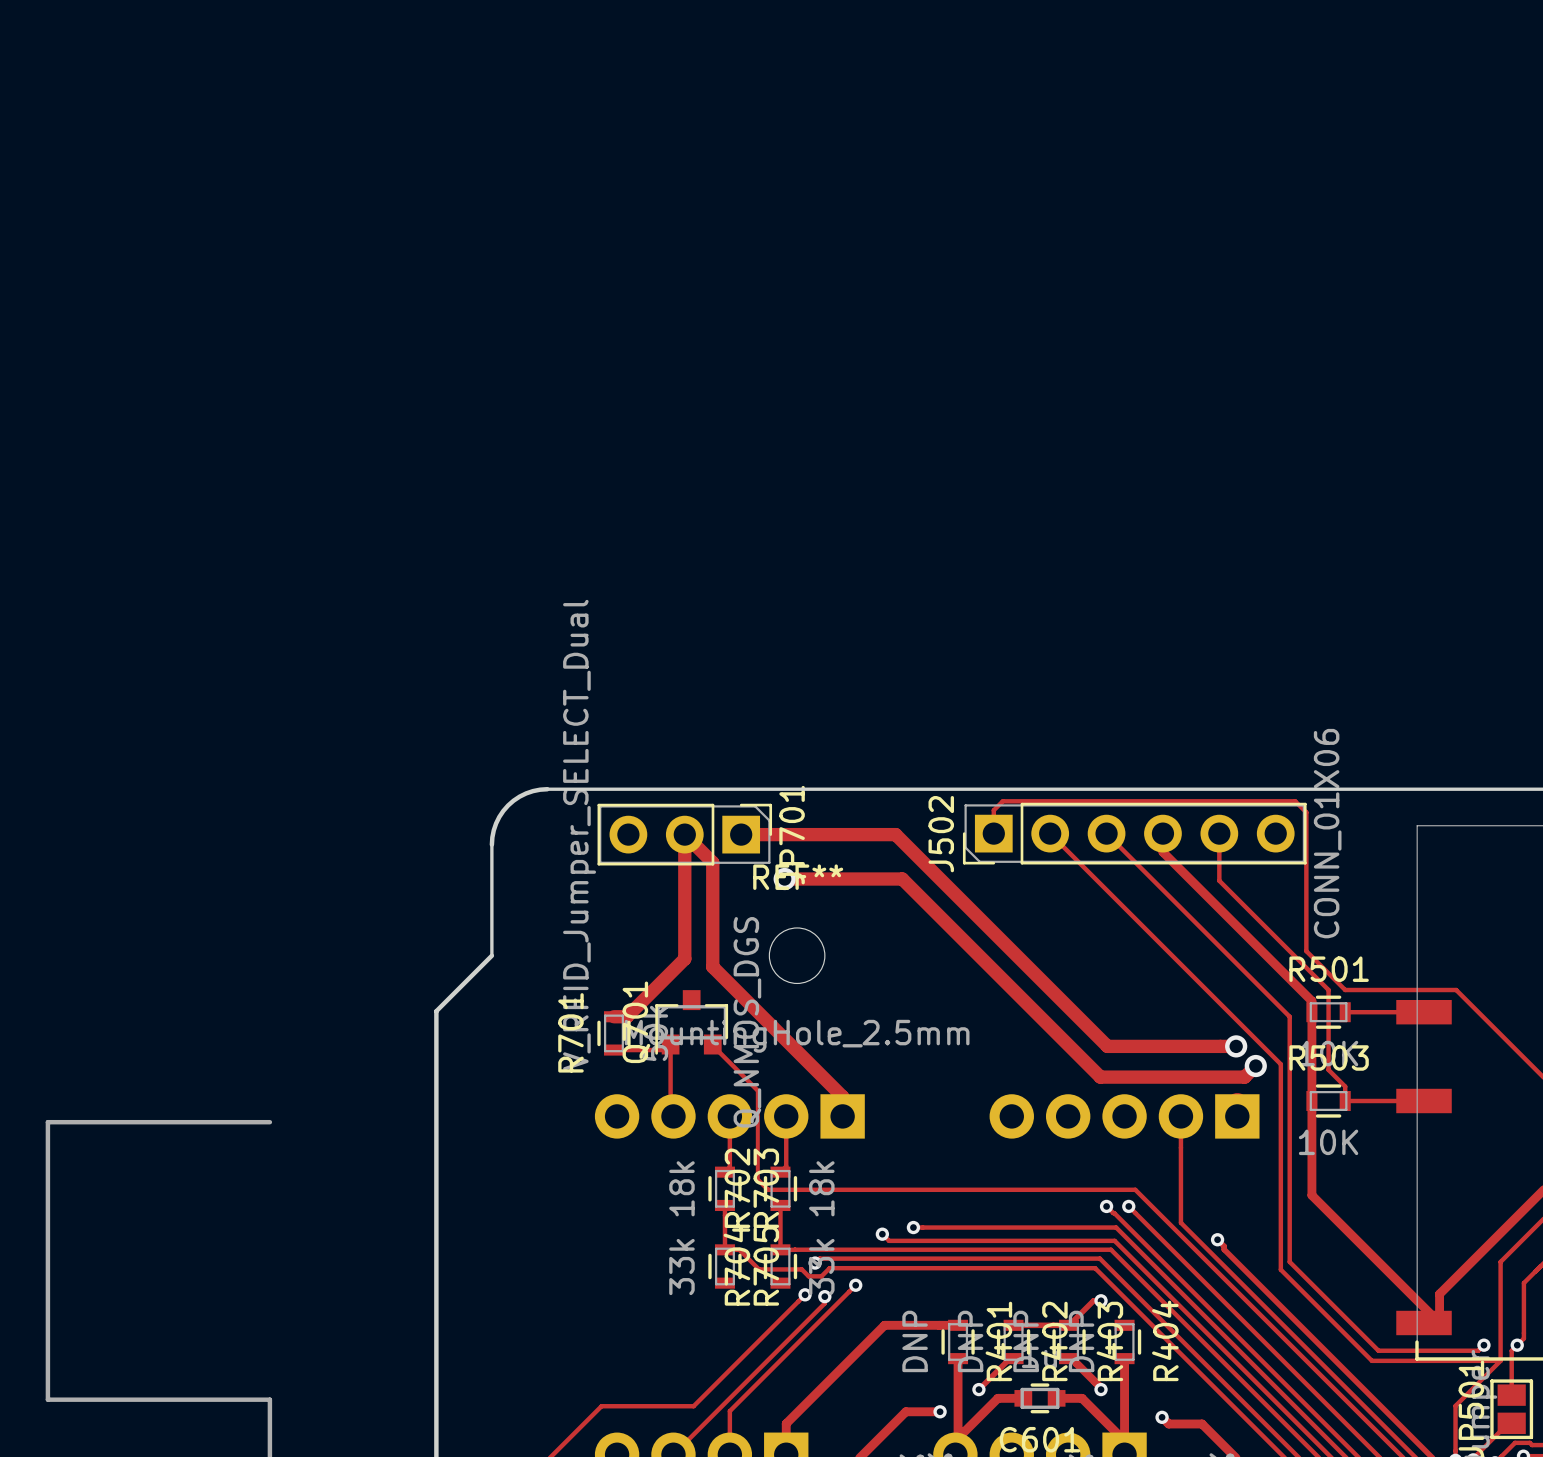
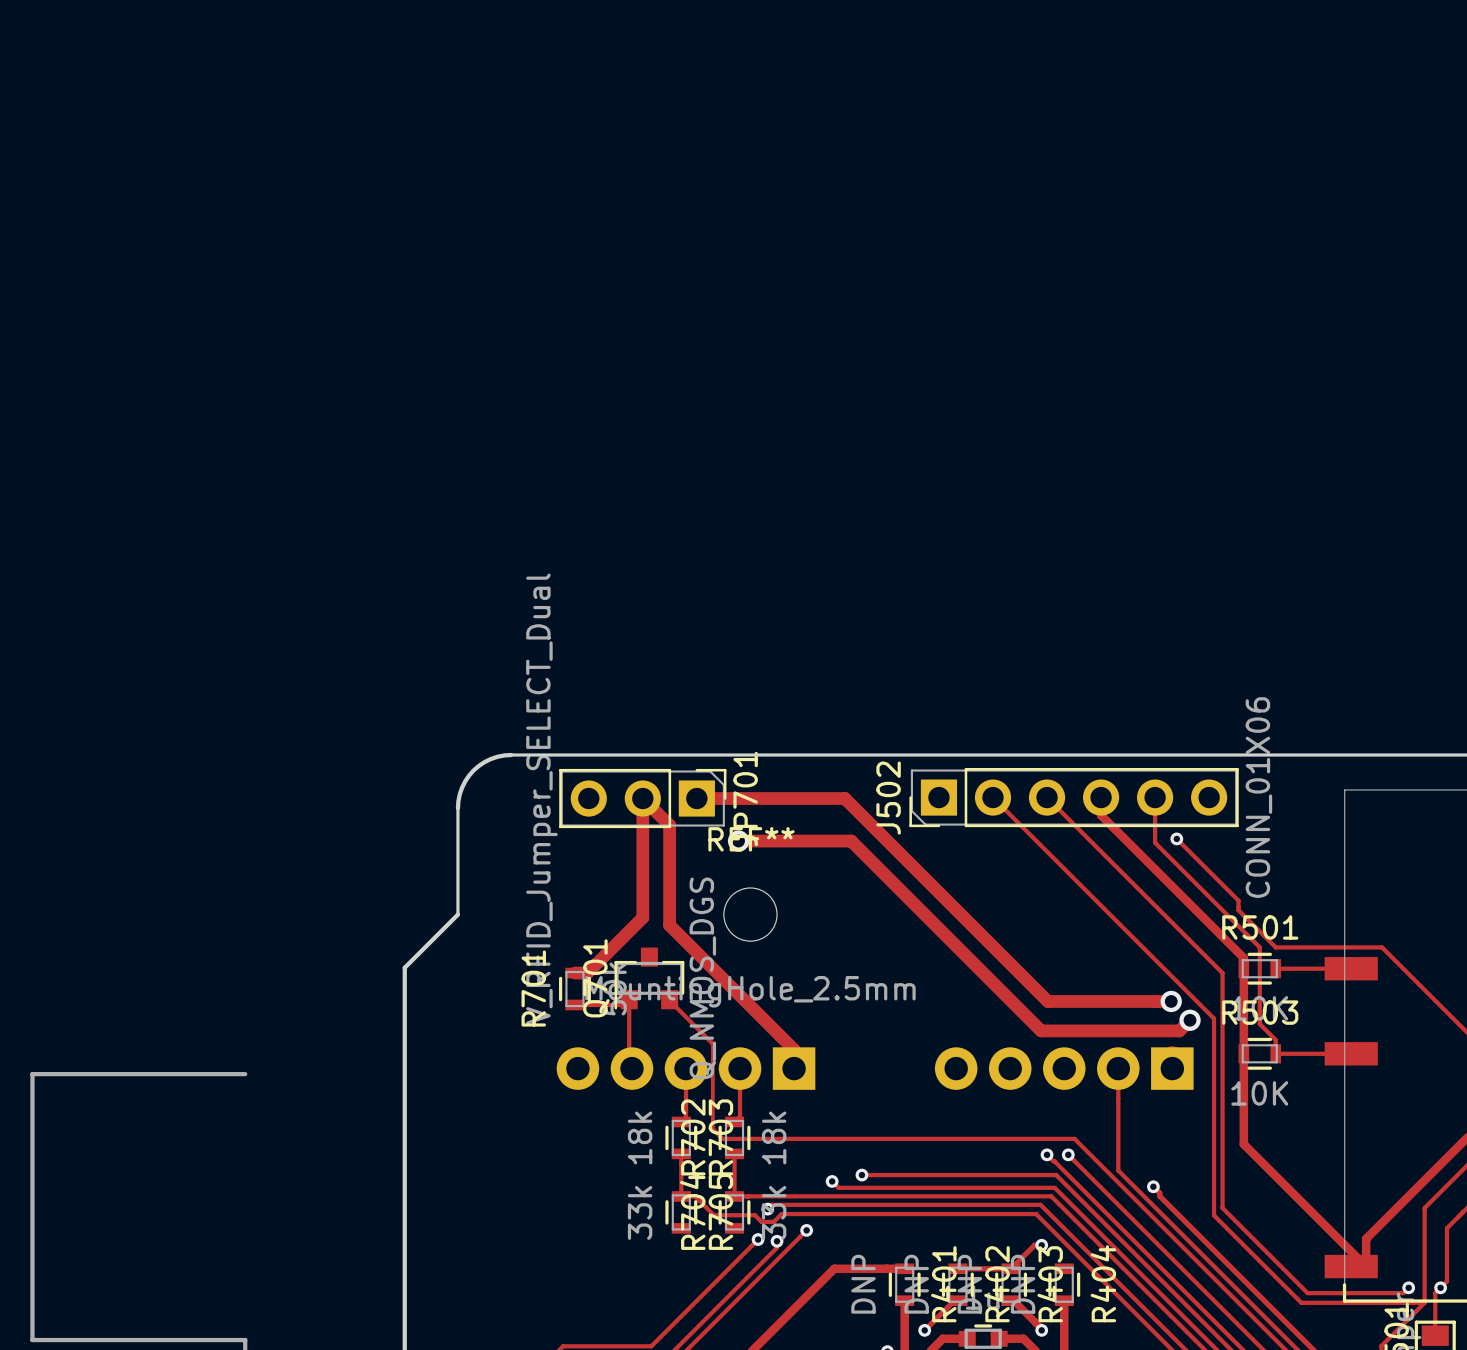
track: (993, 833) (993, 810) (1002, 801) (1295, 801) (1306, 812) (1306, 941) -> (1176, 838) (1238, 900)
via: none -> (1176, 838)

